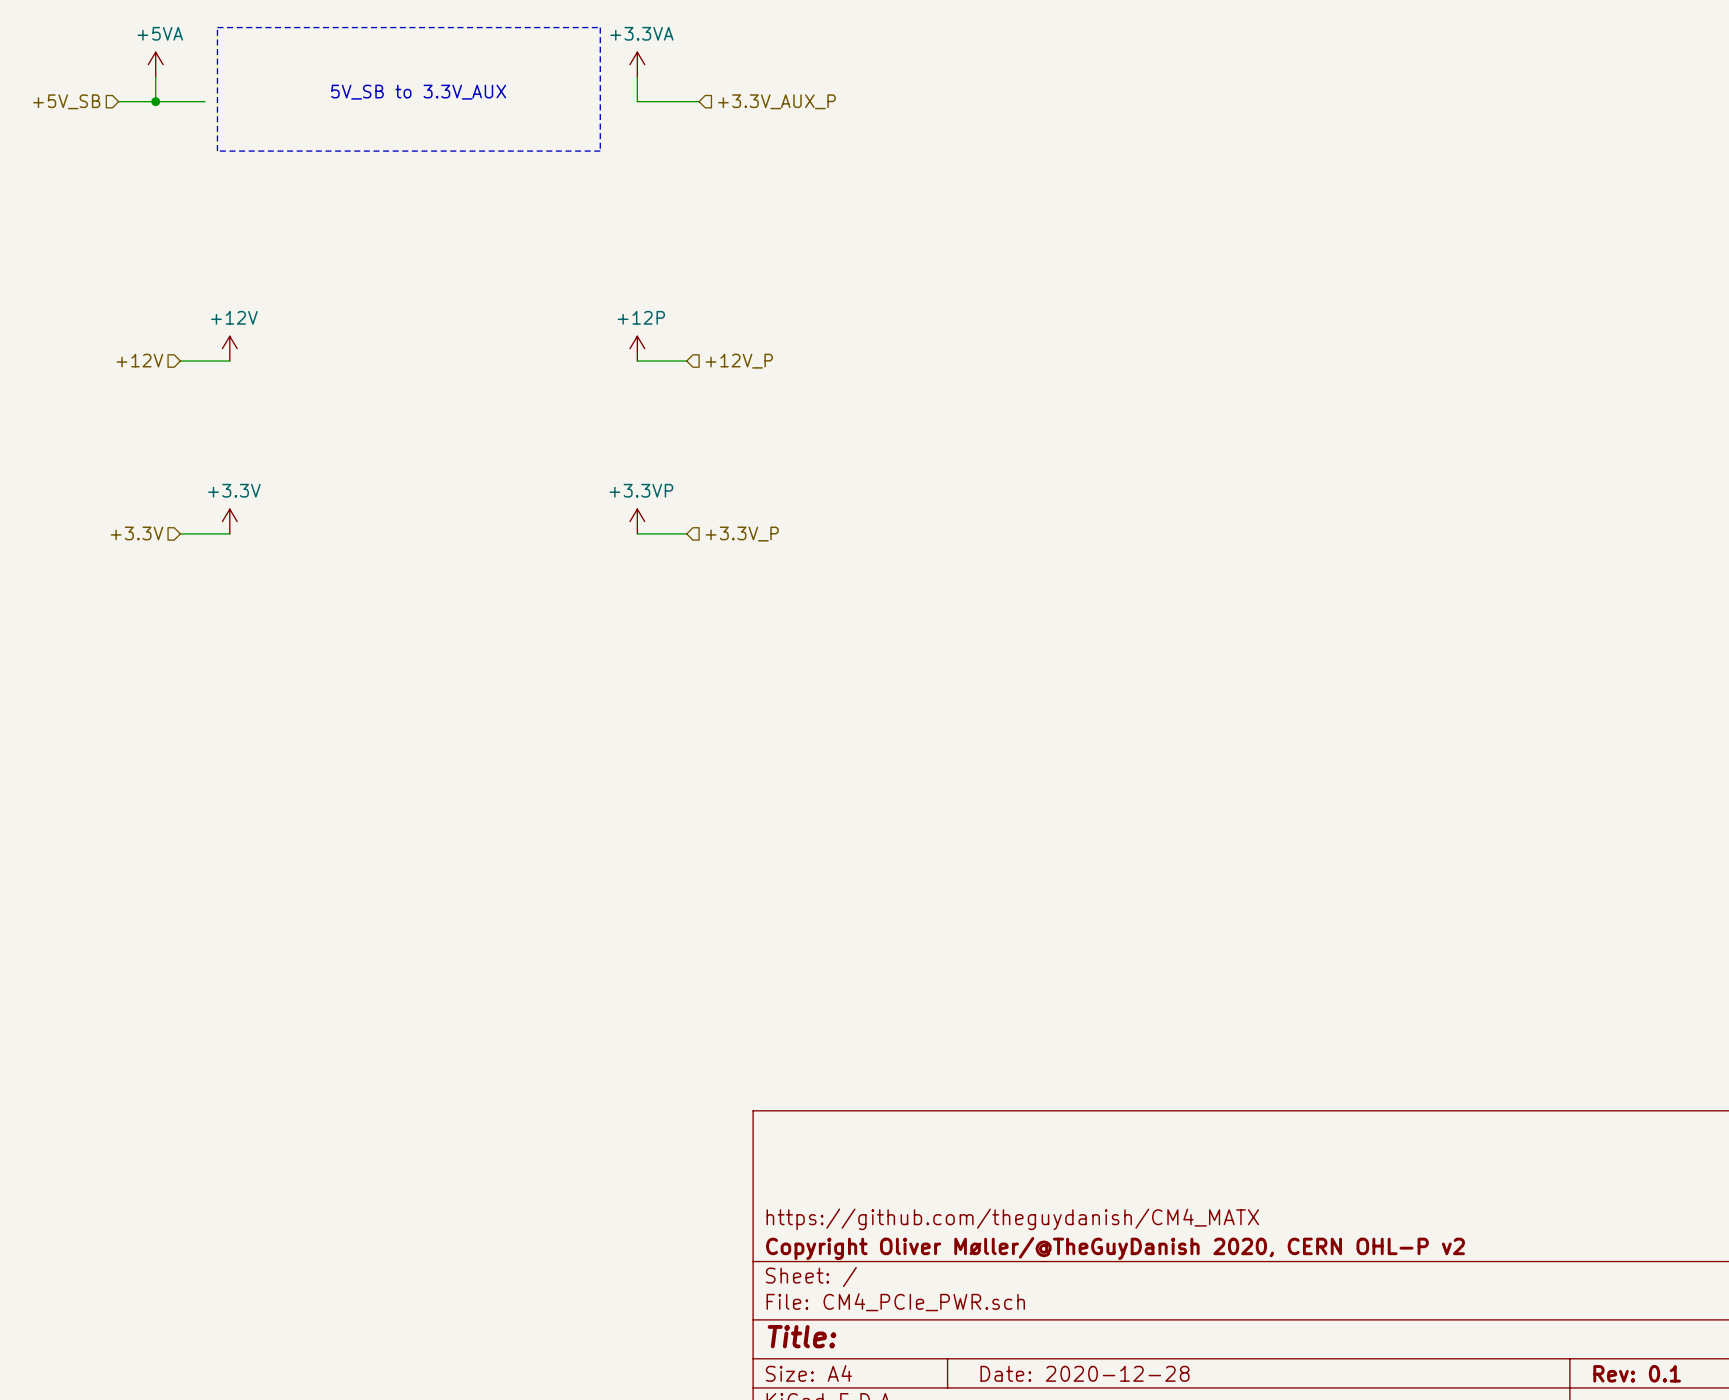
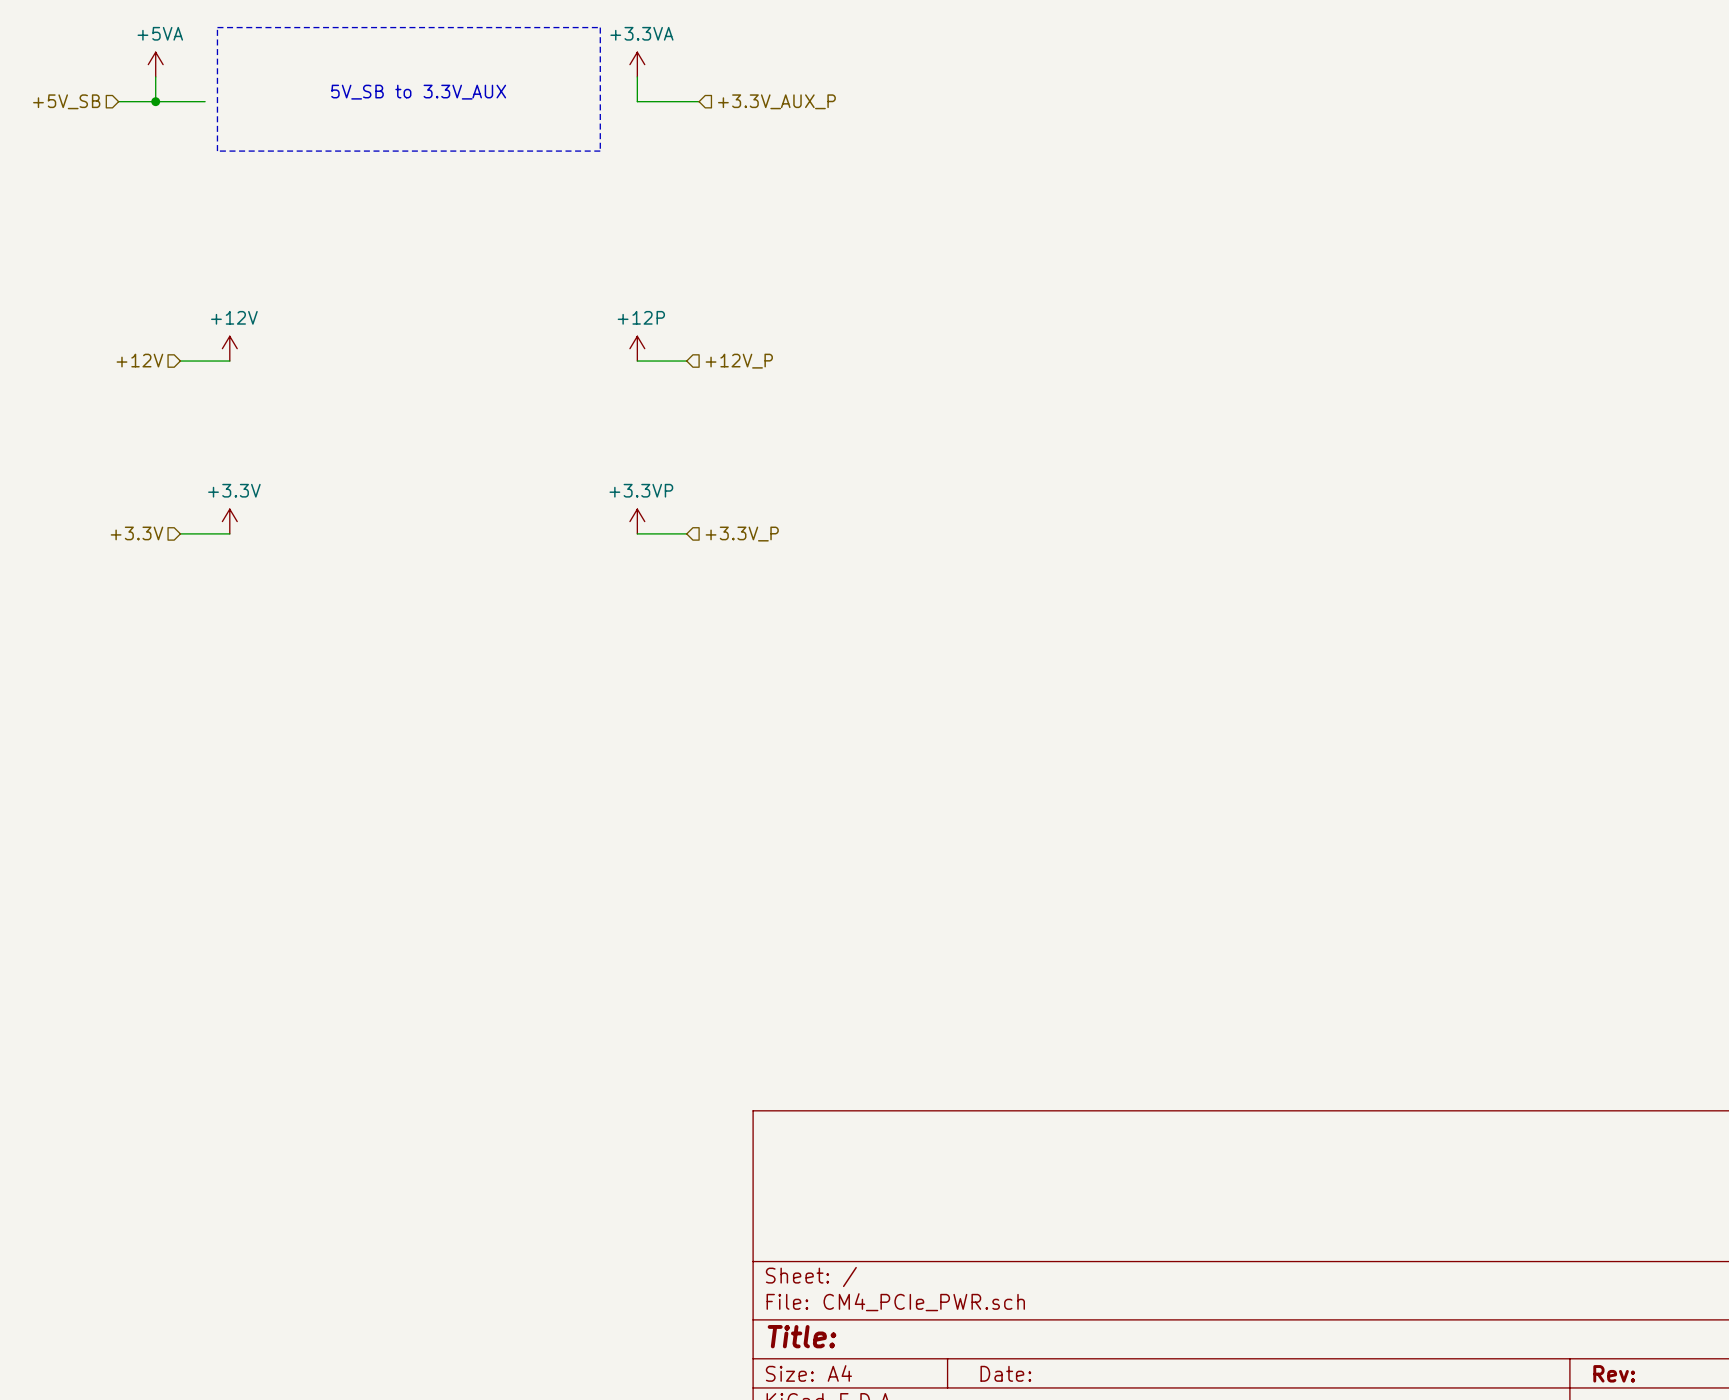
title block: https://github.com/theguydanish/CM4_MATX (1012, 1219) -> none
title block: Copyright Oliver Møller/@TheGuyDanish 2020, CERN OHL-P v2 (1115, 1248) -> none
title block: Date: 2020-12-28 (1085, 1373) -> Date: (1005, 1373)
title block: Rev: 0.1 (1637, 1373) -> Rev: (1614, 1373)

